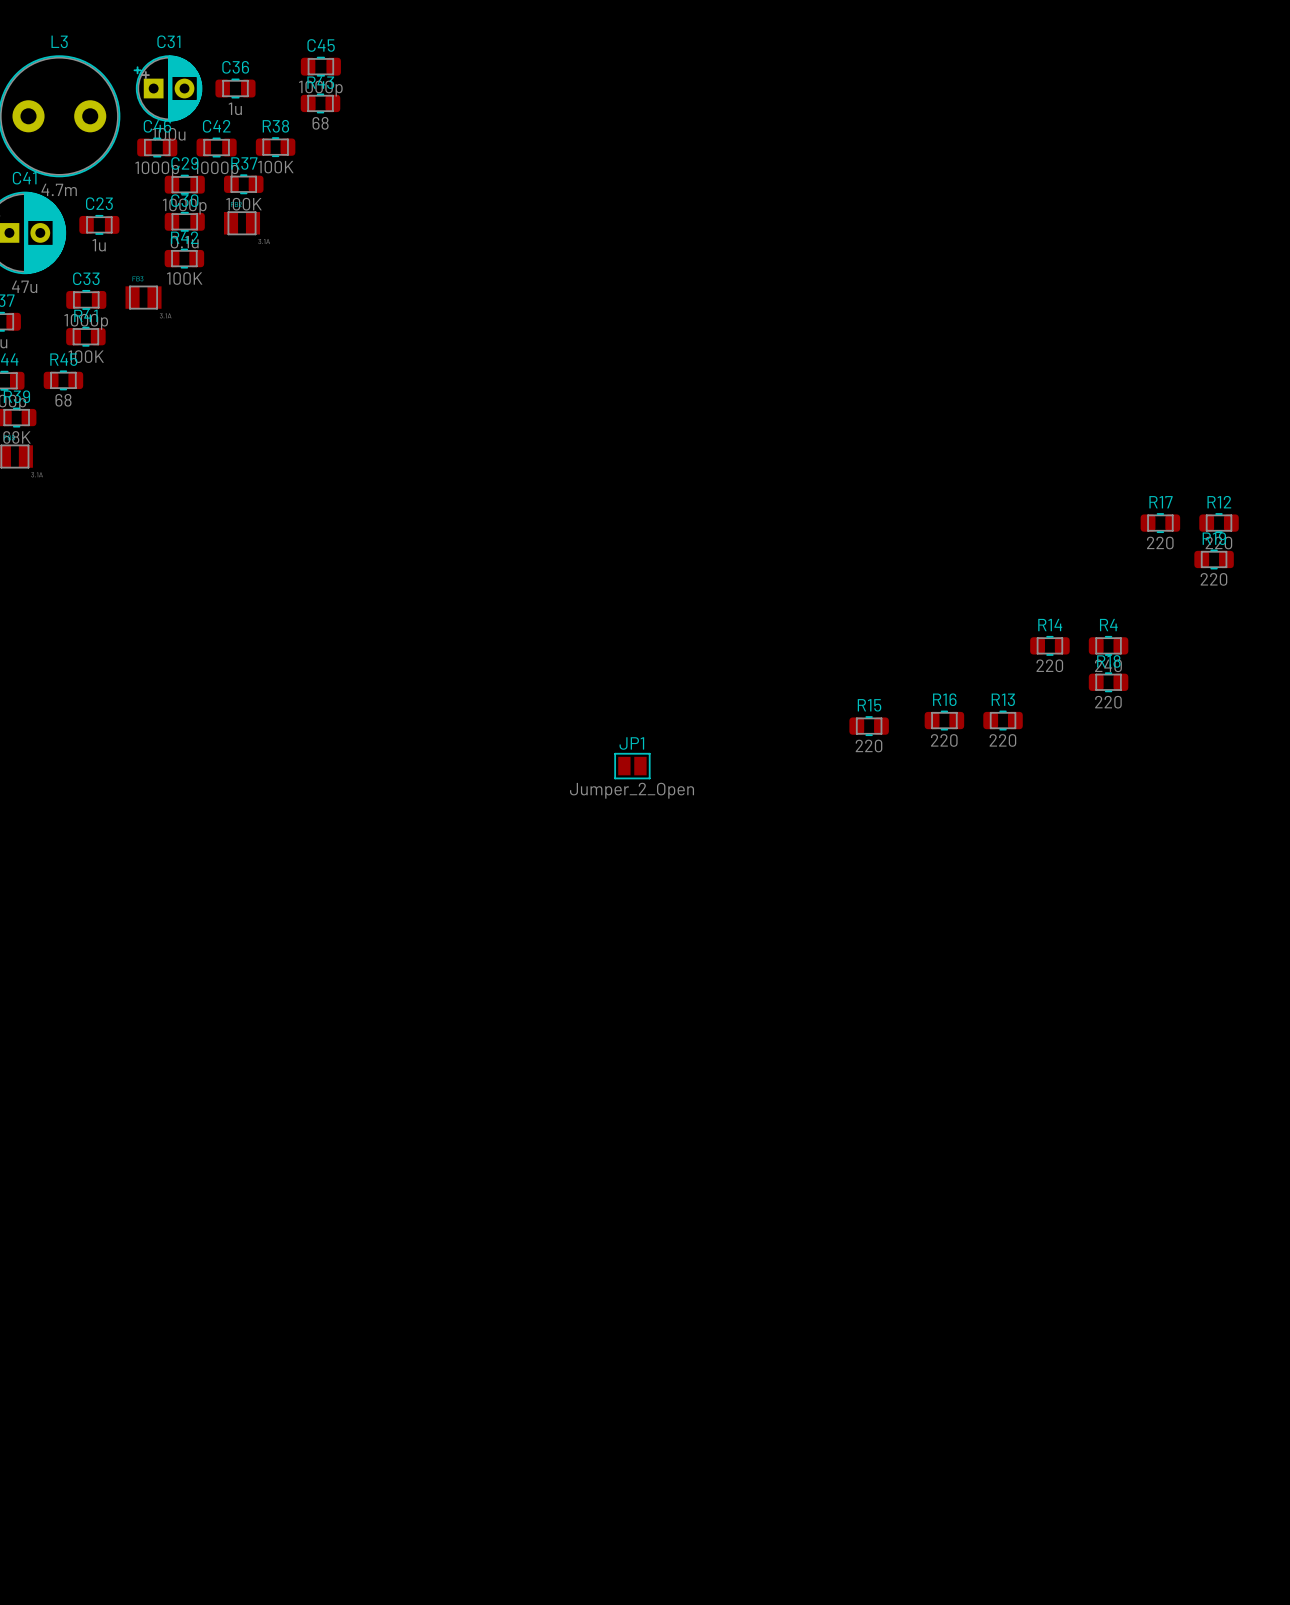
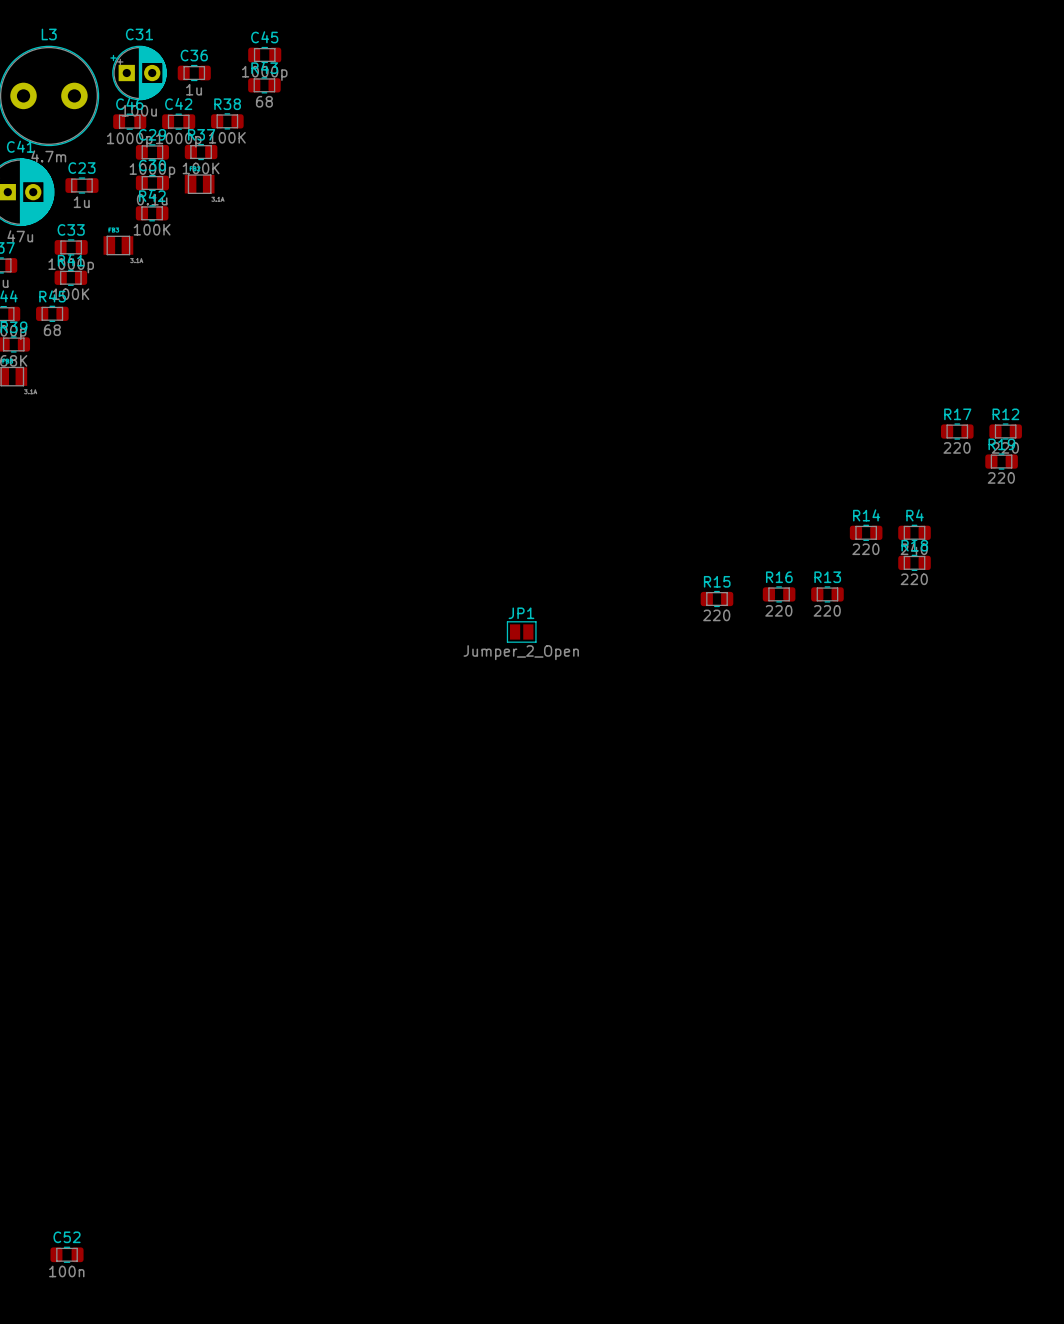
C52: none -> 100n (67, 1254)

